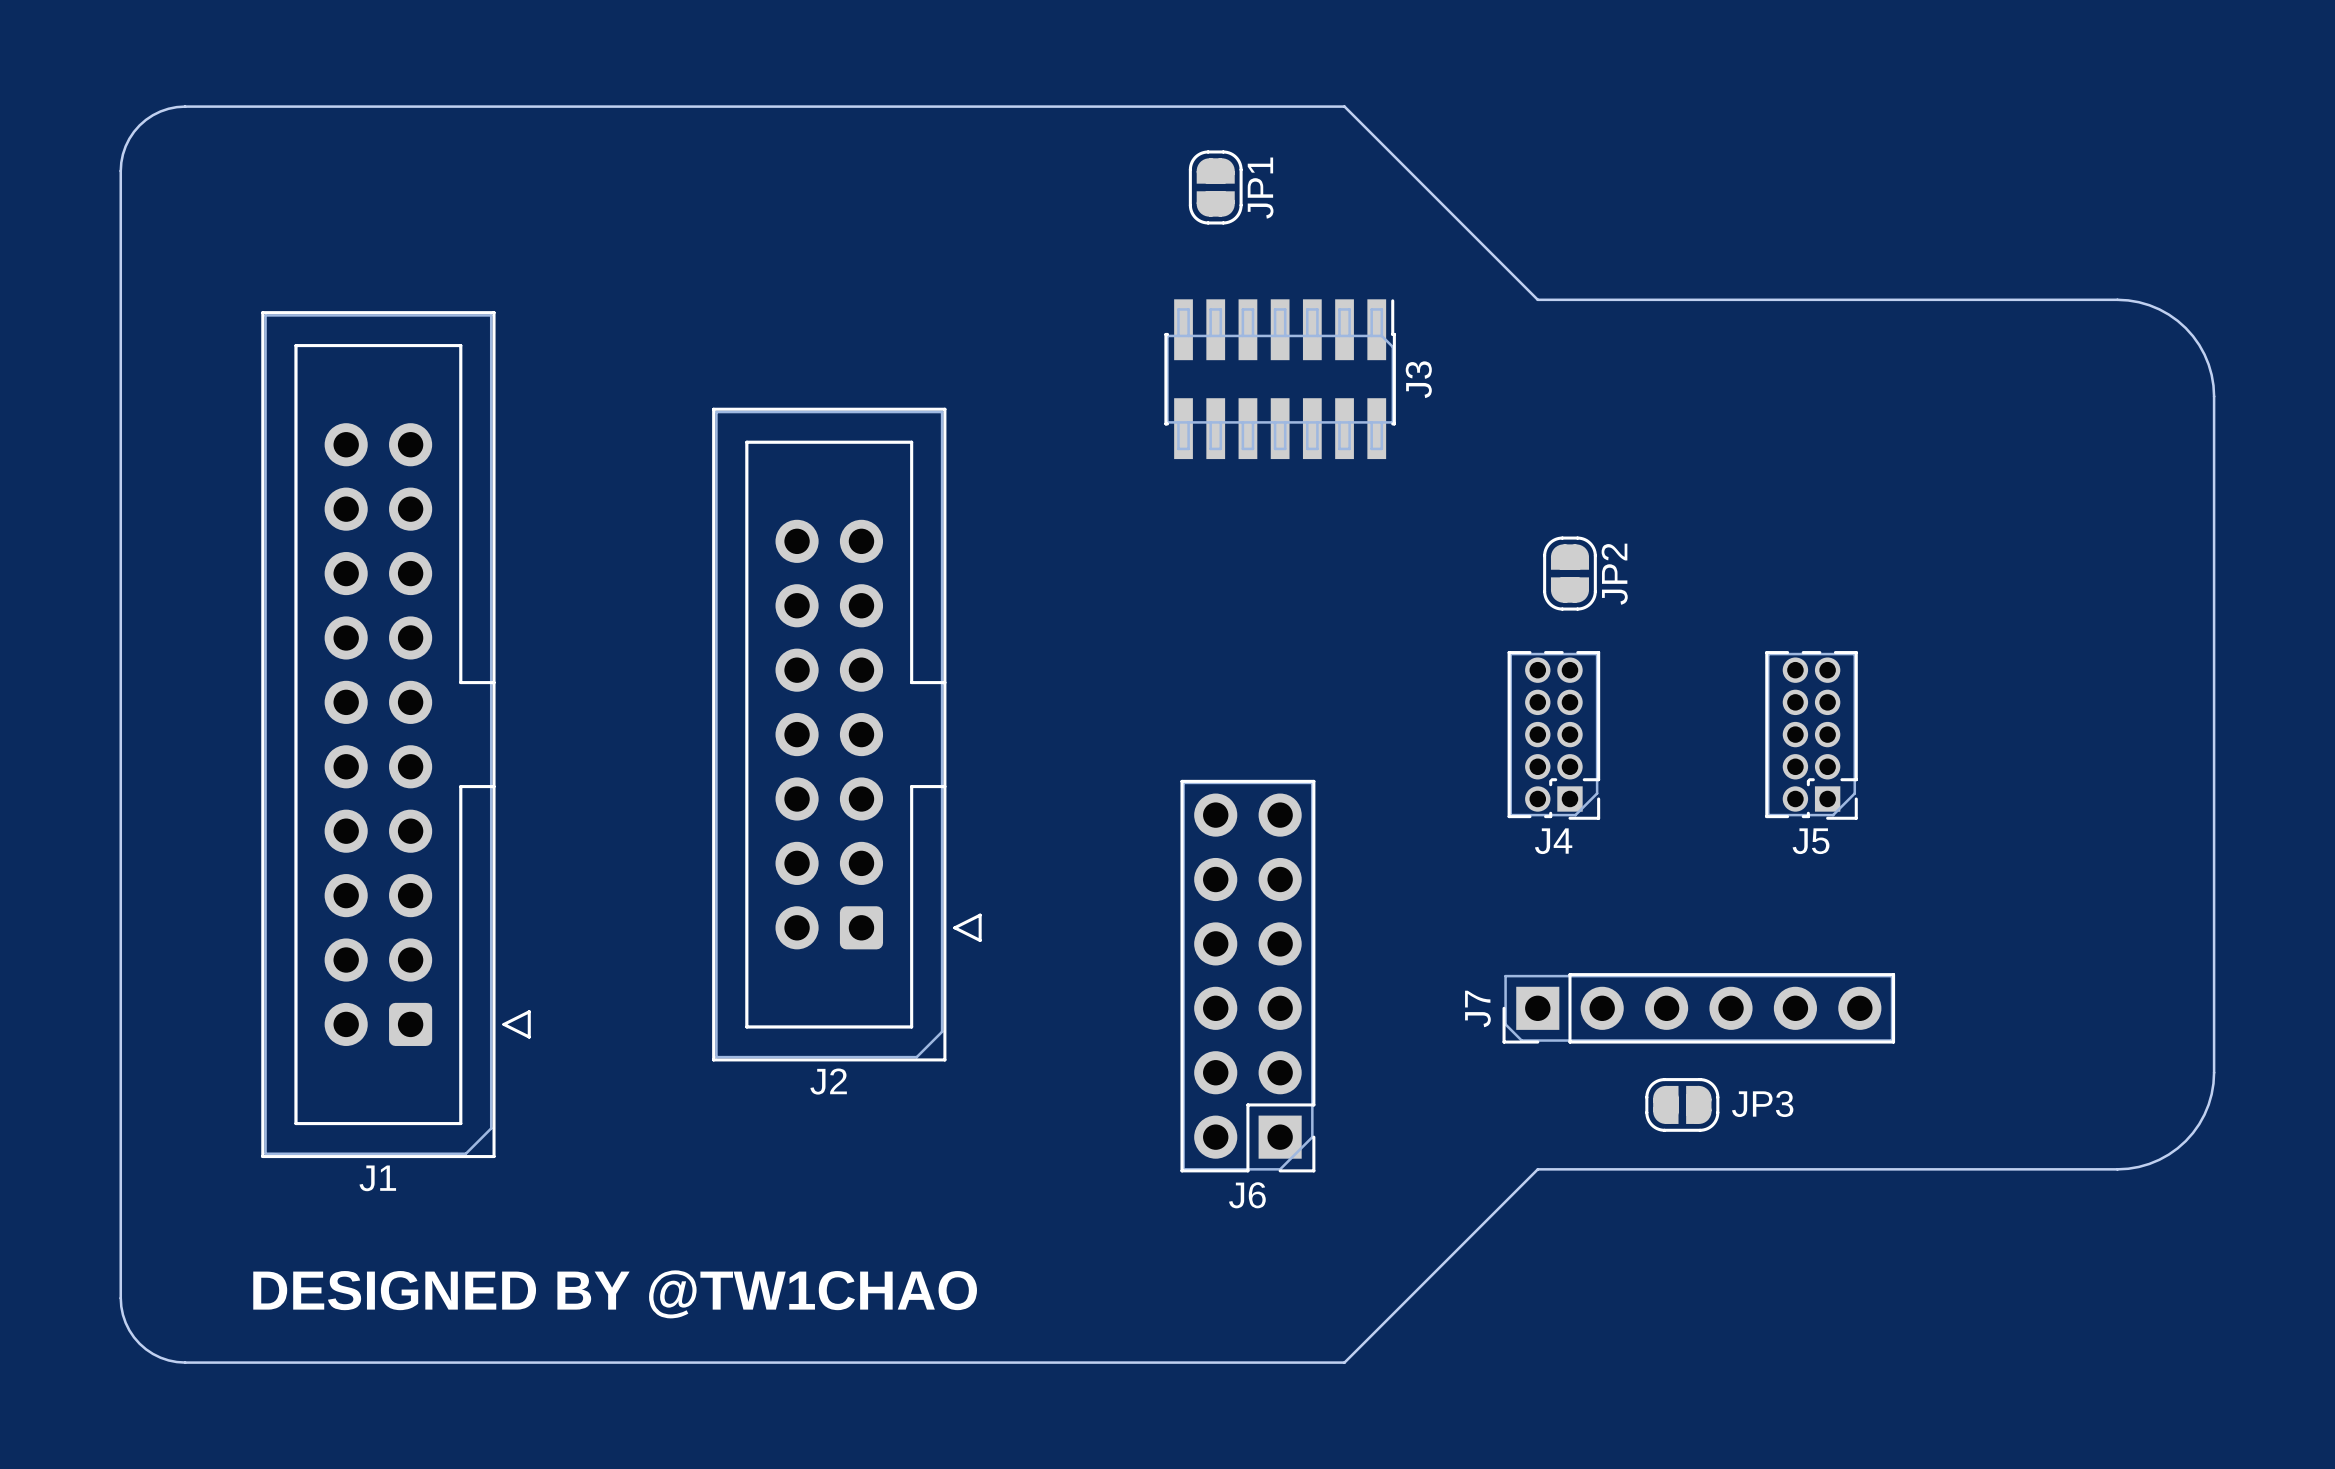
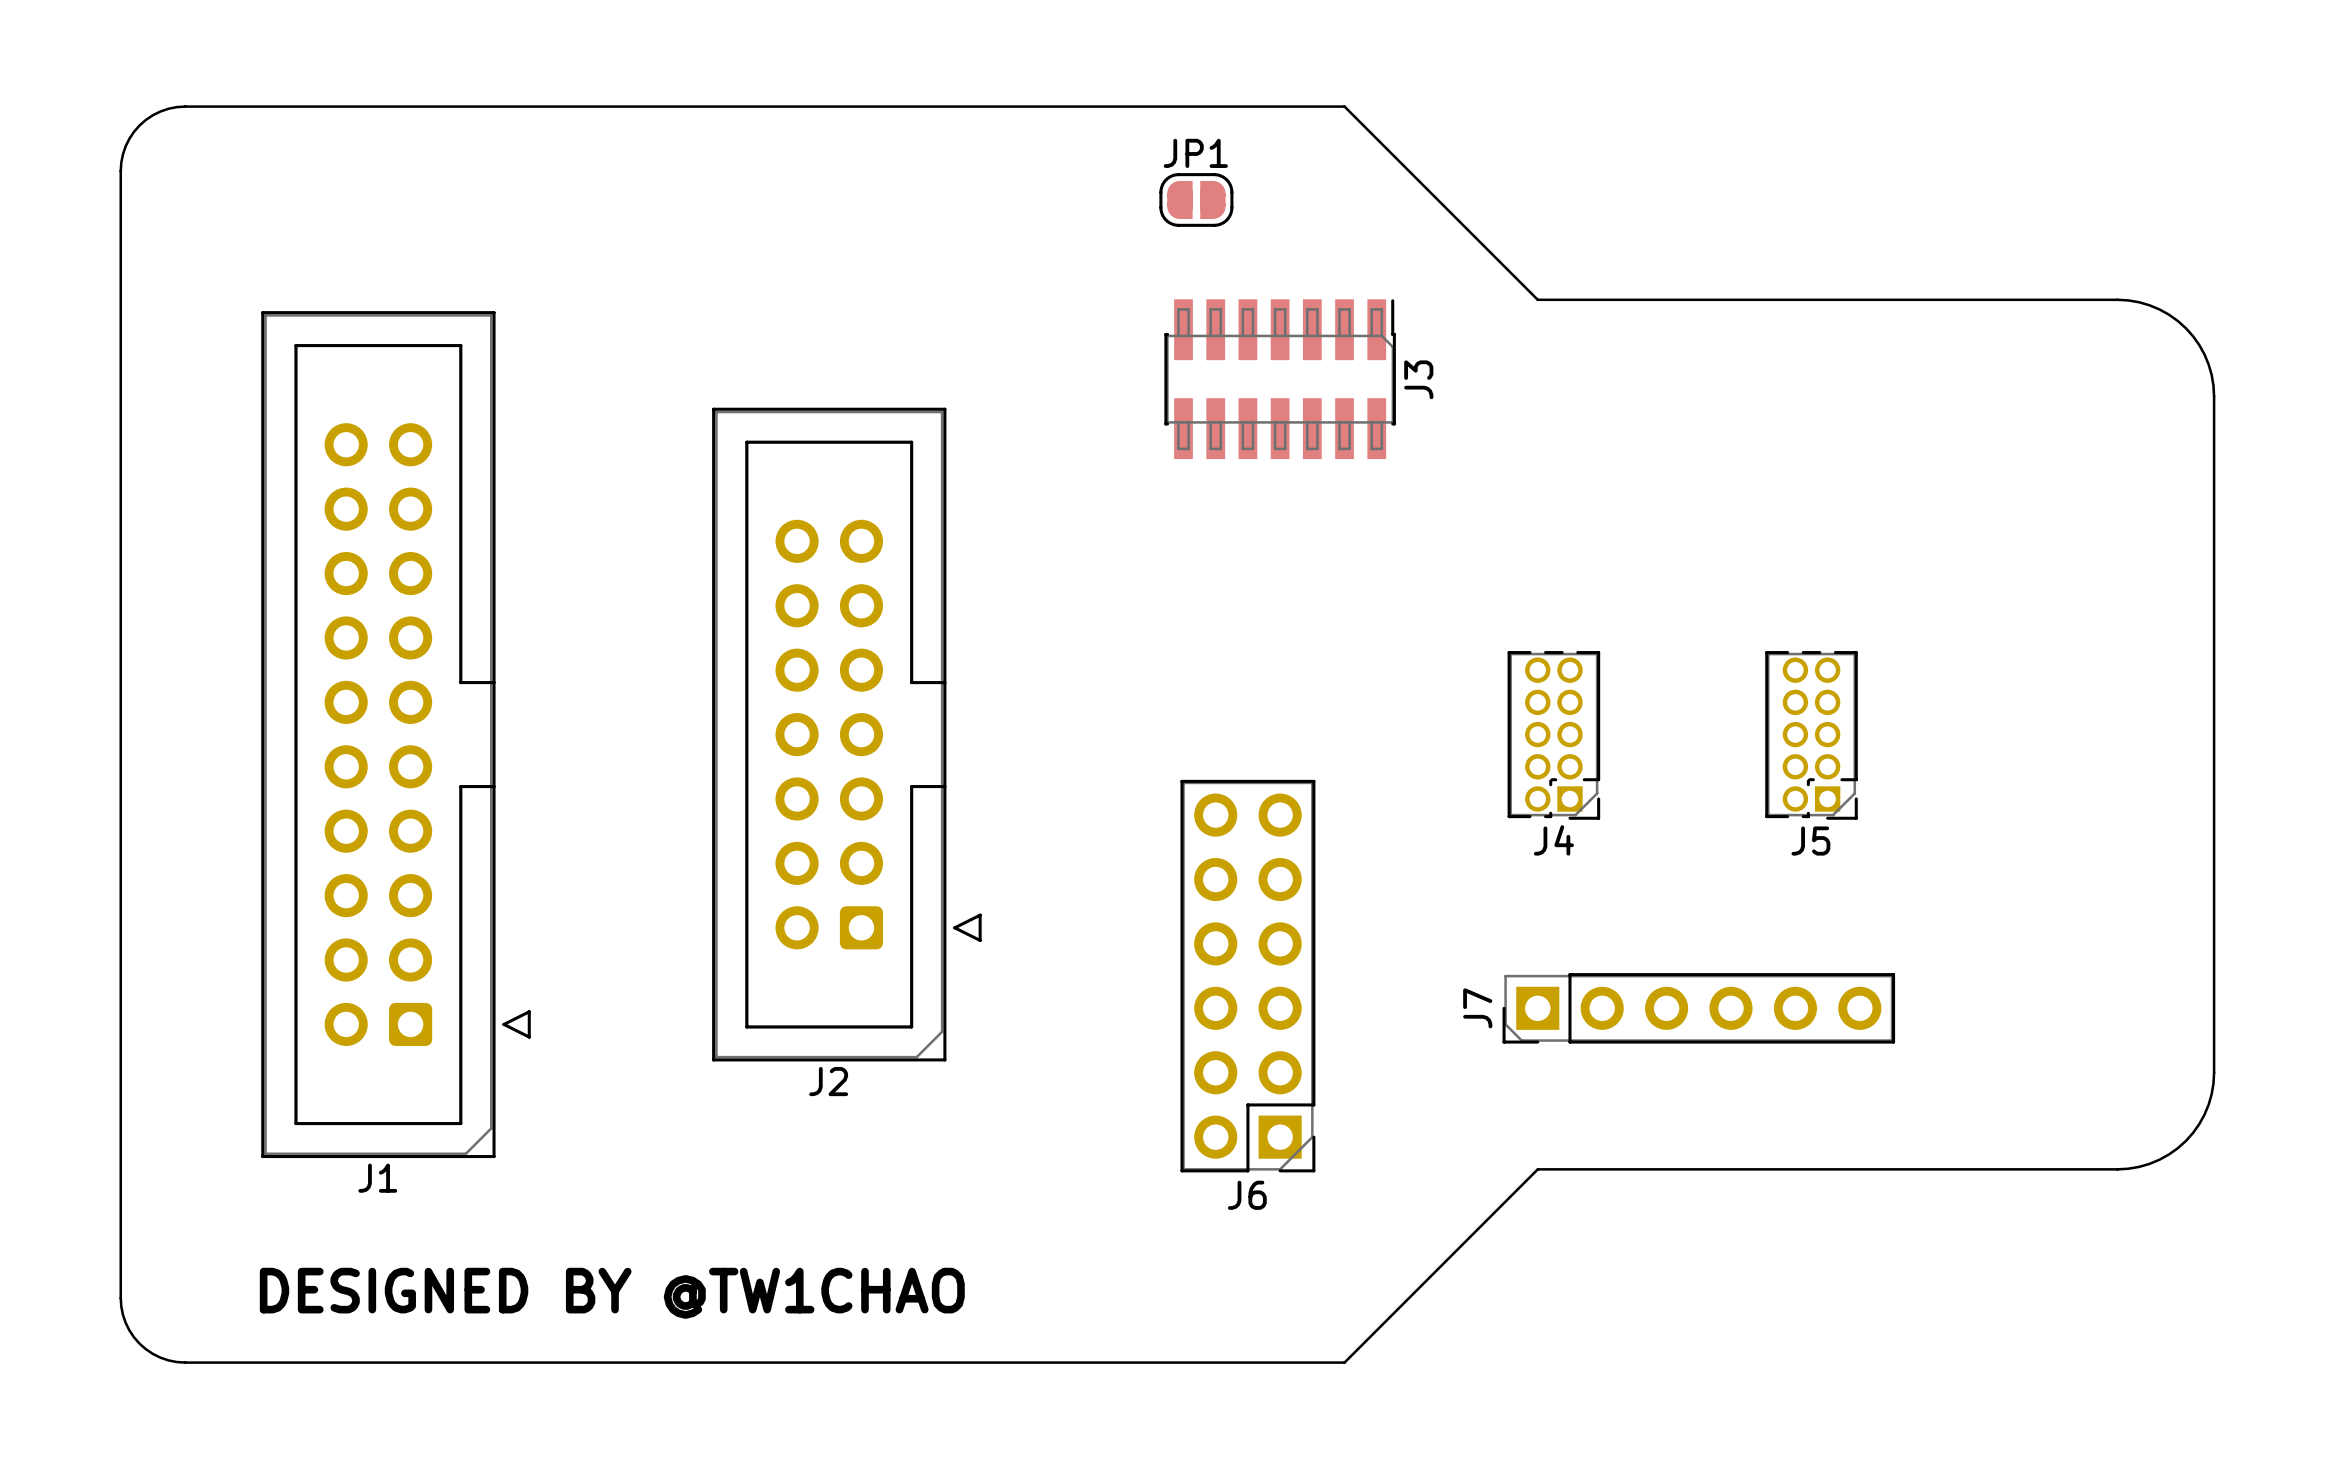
JP1 rotation: 0° (1215, 187) -> 90° clockwise (1196, 199)
JP1 name position: JP1 (1260, 188) -> JP1 (1195, 153)
JP2: (1569, 573) -> none
JP3: (1682, 1104) -> none

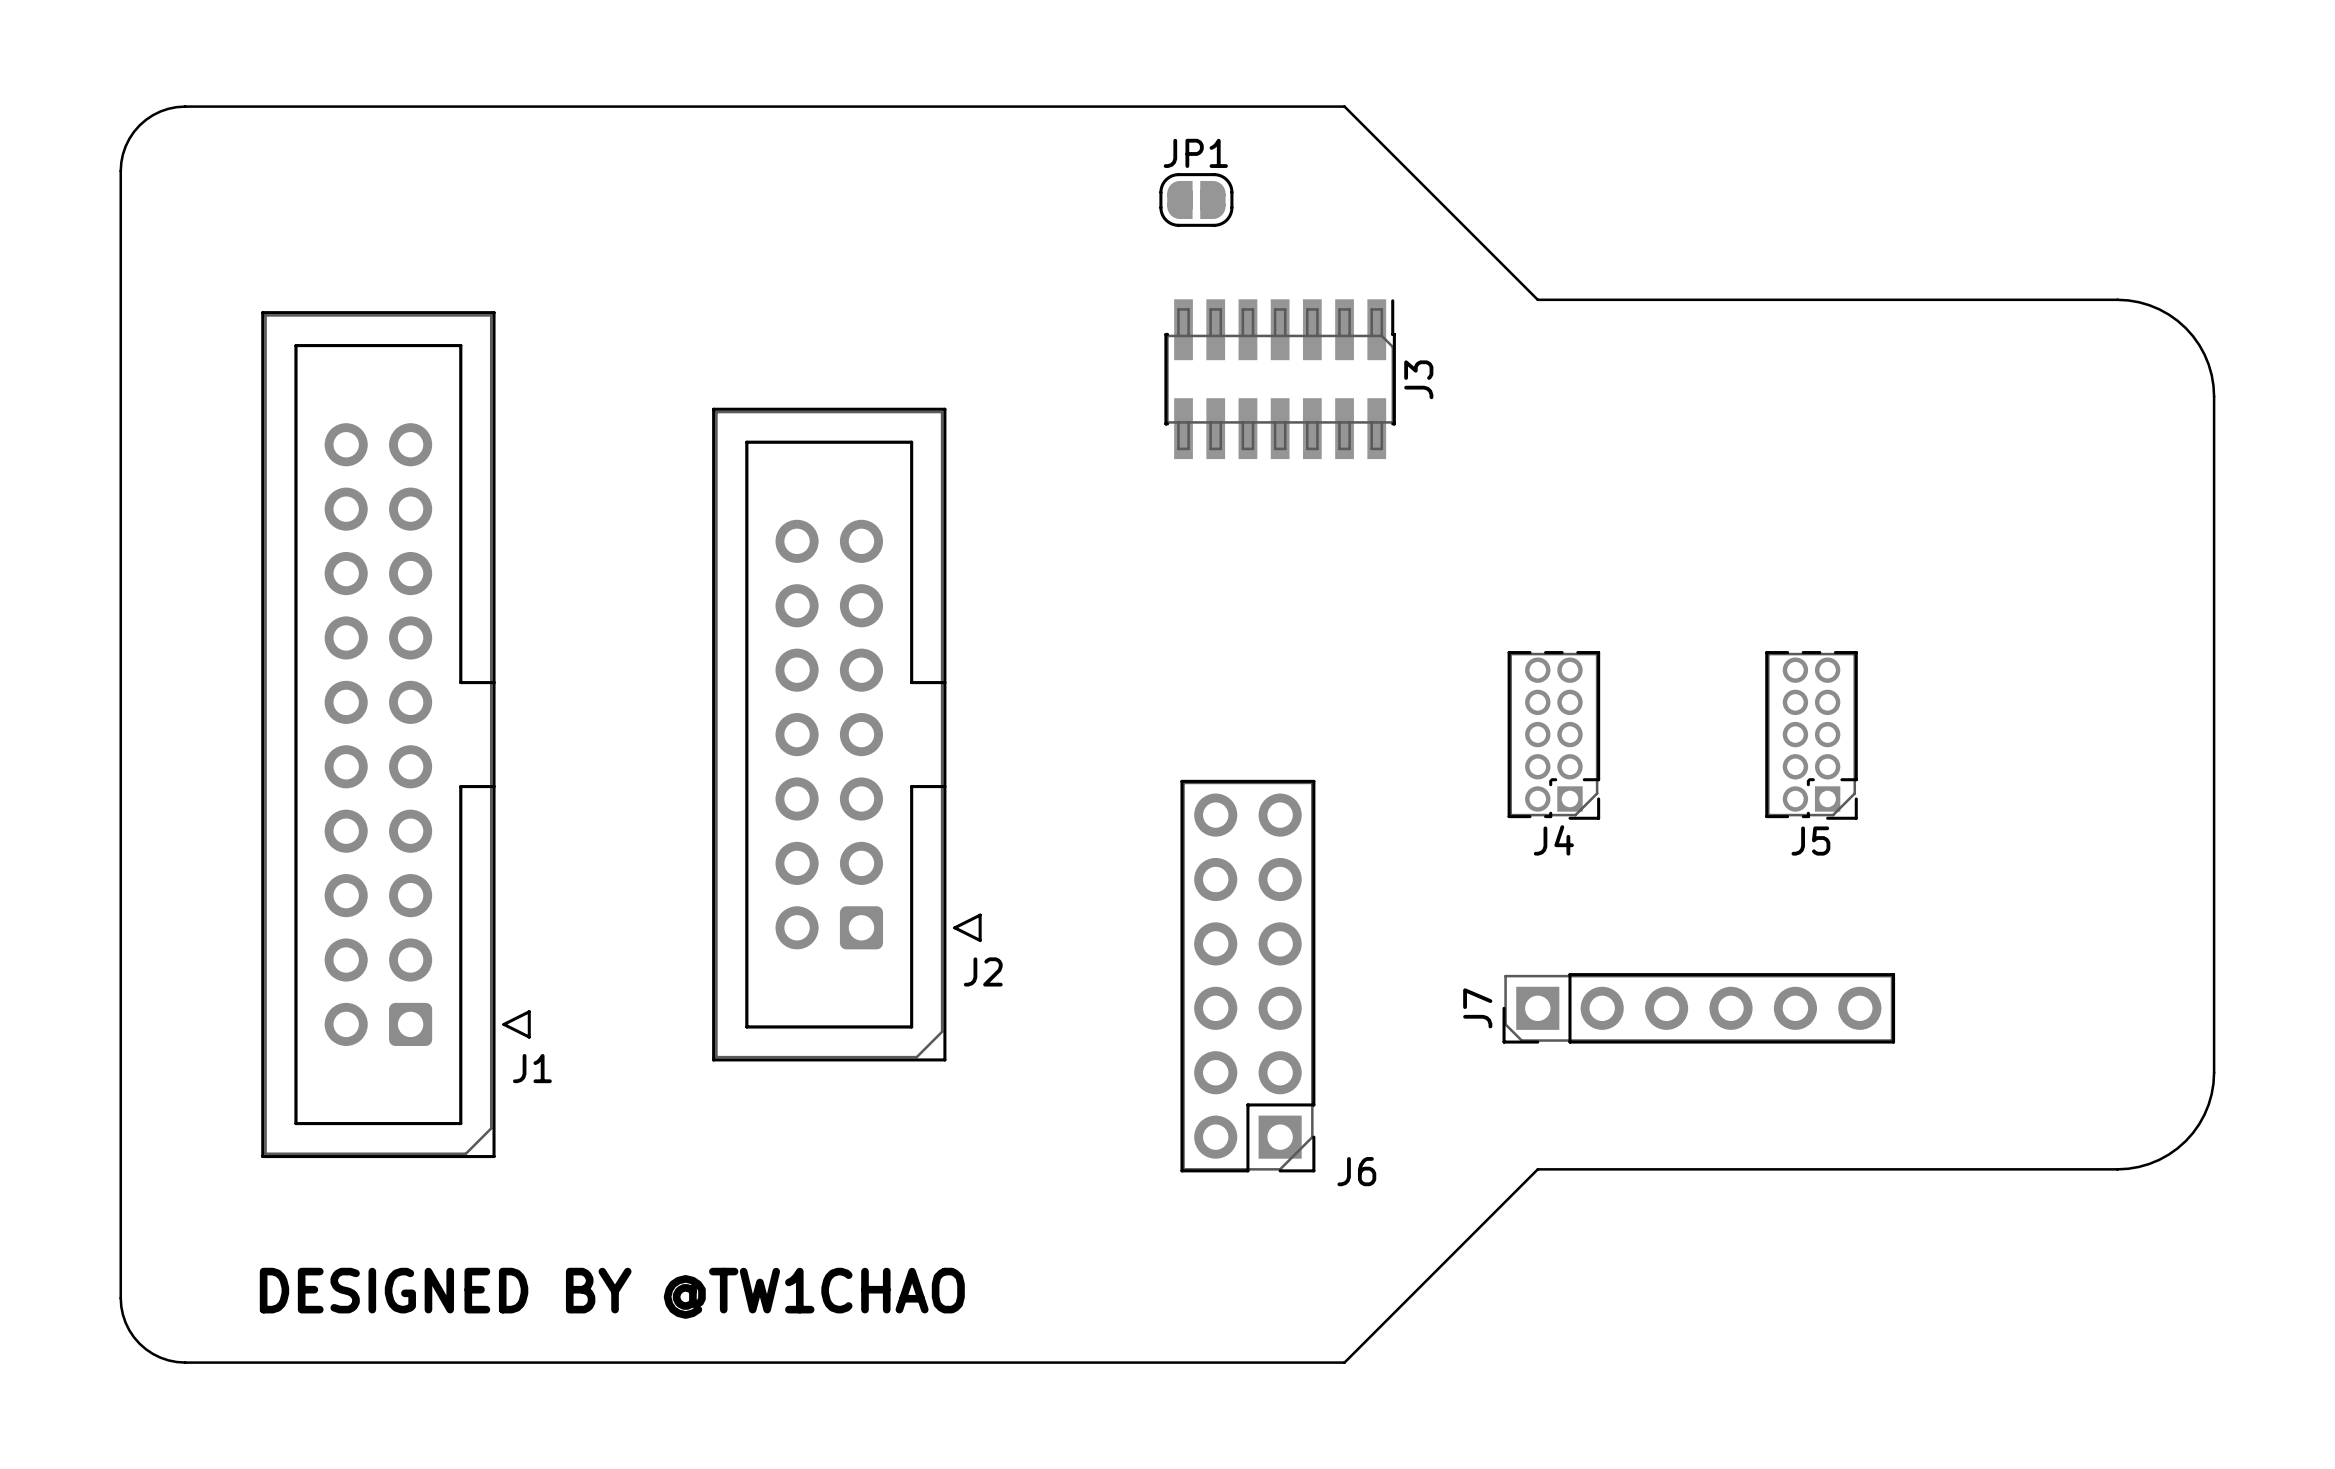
J2 name position: J2 (828, 1081) -> J2 (983, 971)
J1 name position: J1 (377, 1178) -> J1 (532, 1068)
J6 name position: J6 (1247, 1195) -> J6 (1356, 1171)

